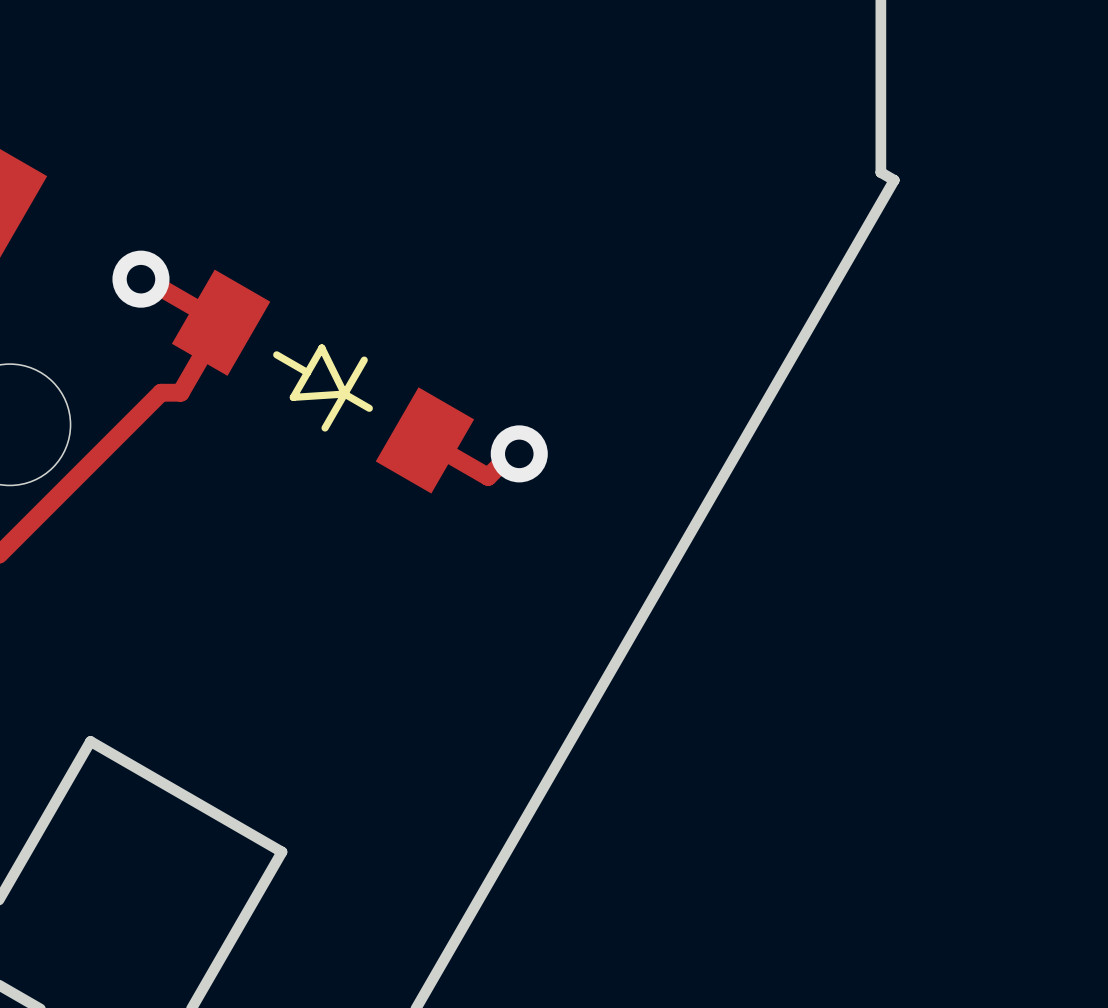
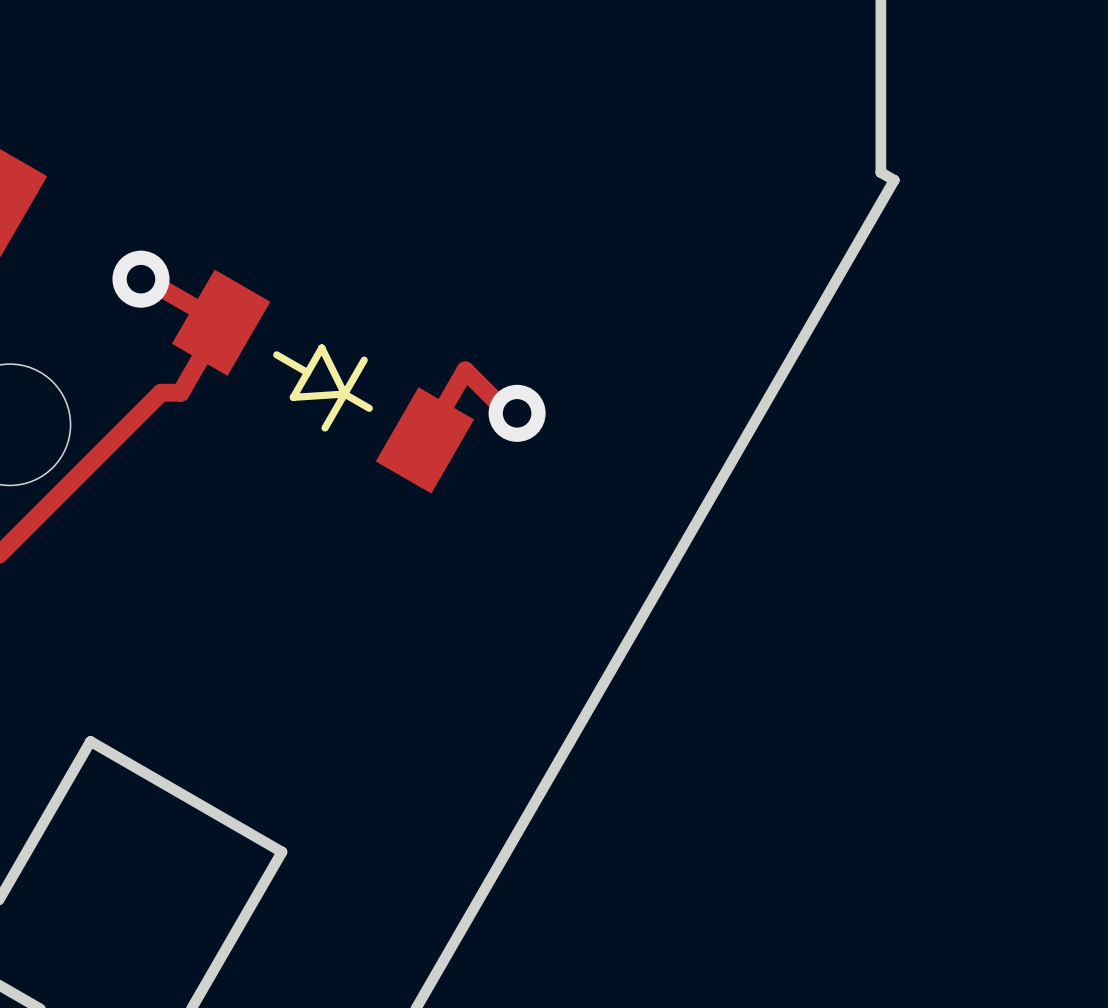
track: (424, 440) (488, 476) (511, 453) (519, 453) -> (424, 440) (465, 370) (508, 413) (517, 413)
via position: (519, 453) -> (517, 413)

